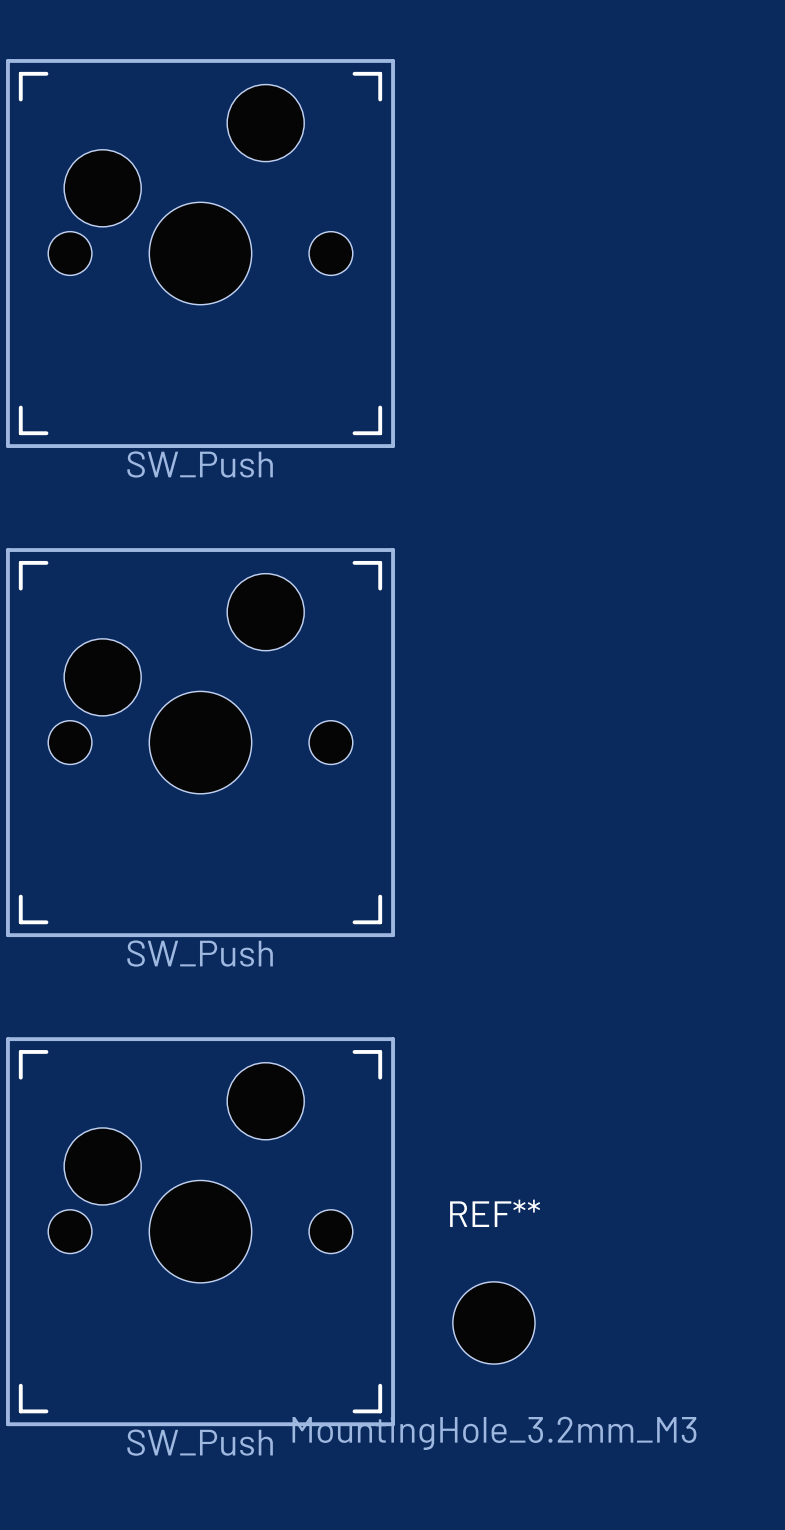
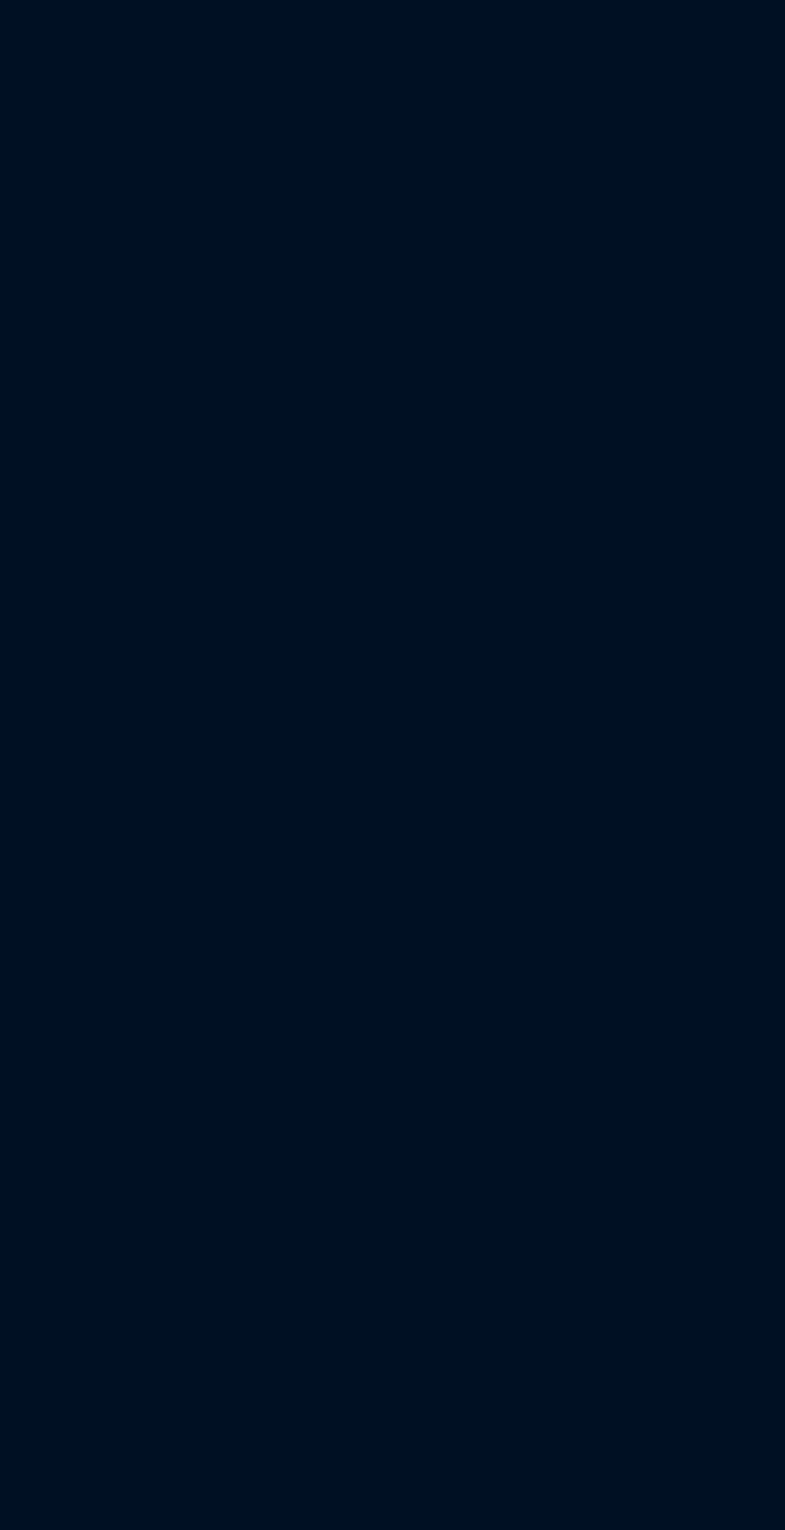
part: SW_Push (200, 253) -> none
part: SW_Push (200, 742) -> none
part: SW_Push (200, 1231) -> none
REF**: MountingHole_3.2mm_M3 (493, 1322) -> none

